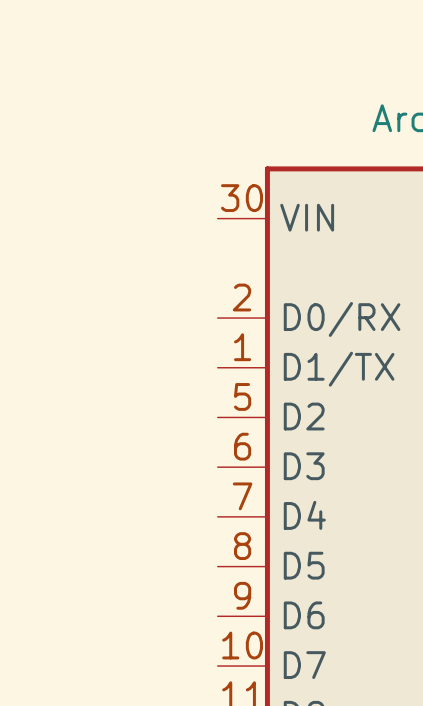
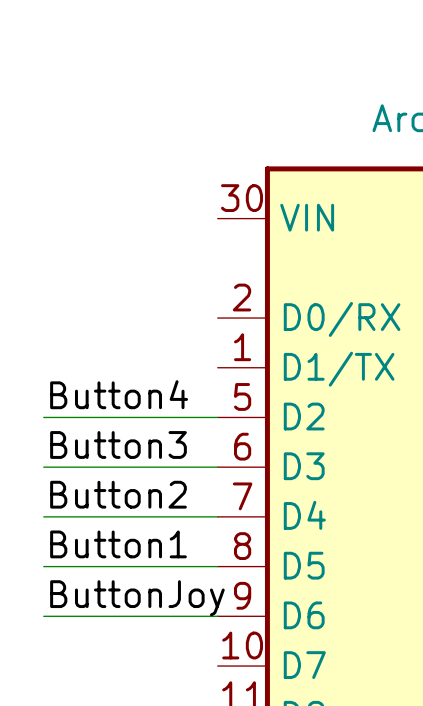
label: none -> Button4 (119, 394)
wire: none -> (43, 417) (217, 417)
label: none -> Button3 (118, 444)
wire: none -> (43, 467) (217, 467)
label: none -> Button2 (118, 494)
wire: none -> (43, 516) (217, 516)
label: none -> Button1 (118, 544)
wire: none -> (43, 566) (217, 566)
label: none -> ButtonJoy (137, 598)
wire: none -> (43, 616) (217, 616)

